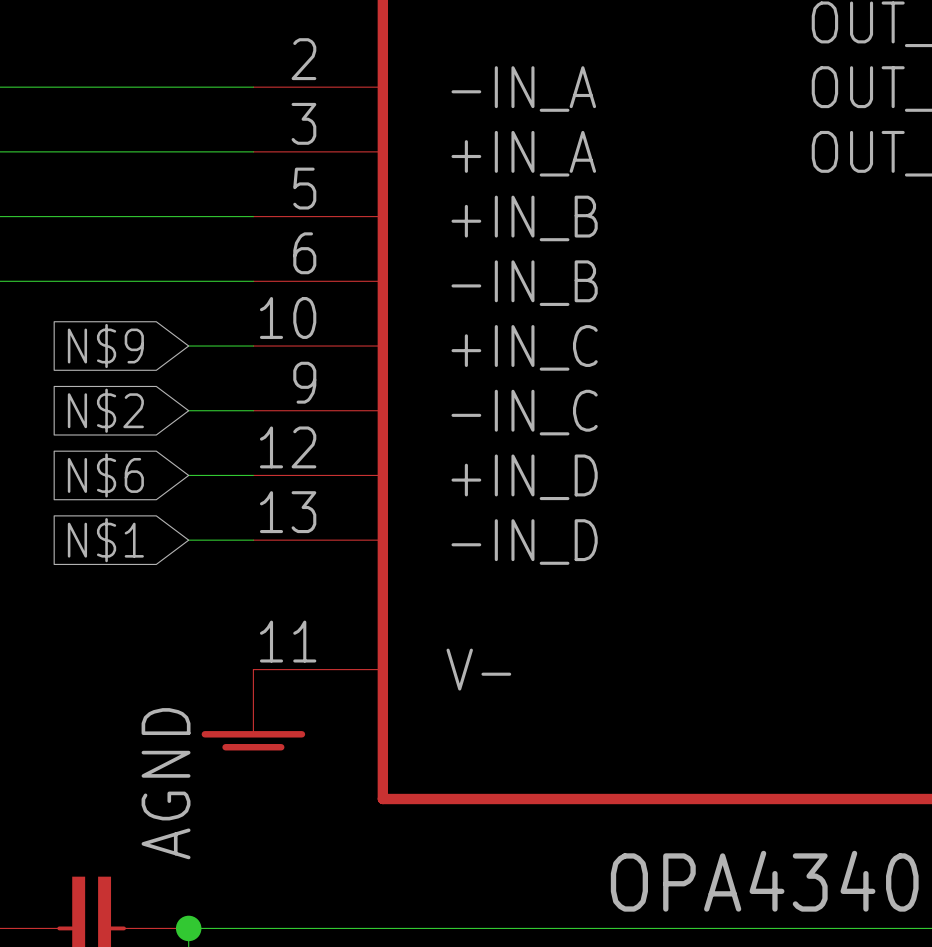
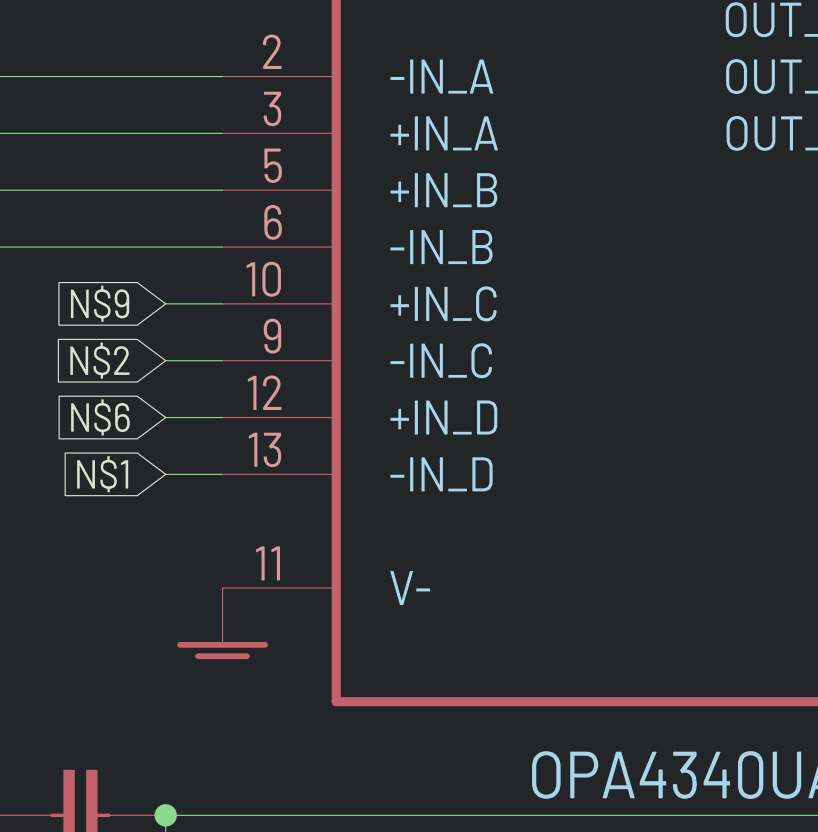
power symbol text: AGND (166, 783) -> none

